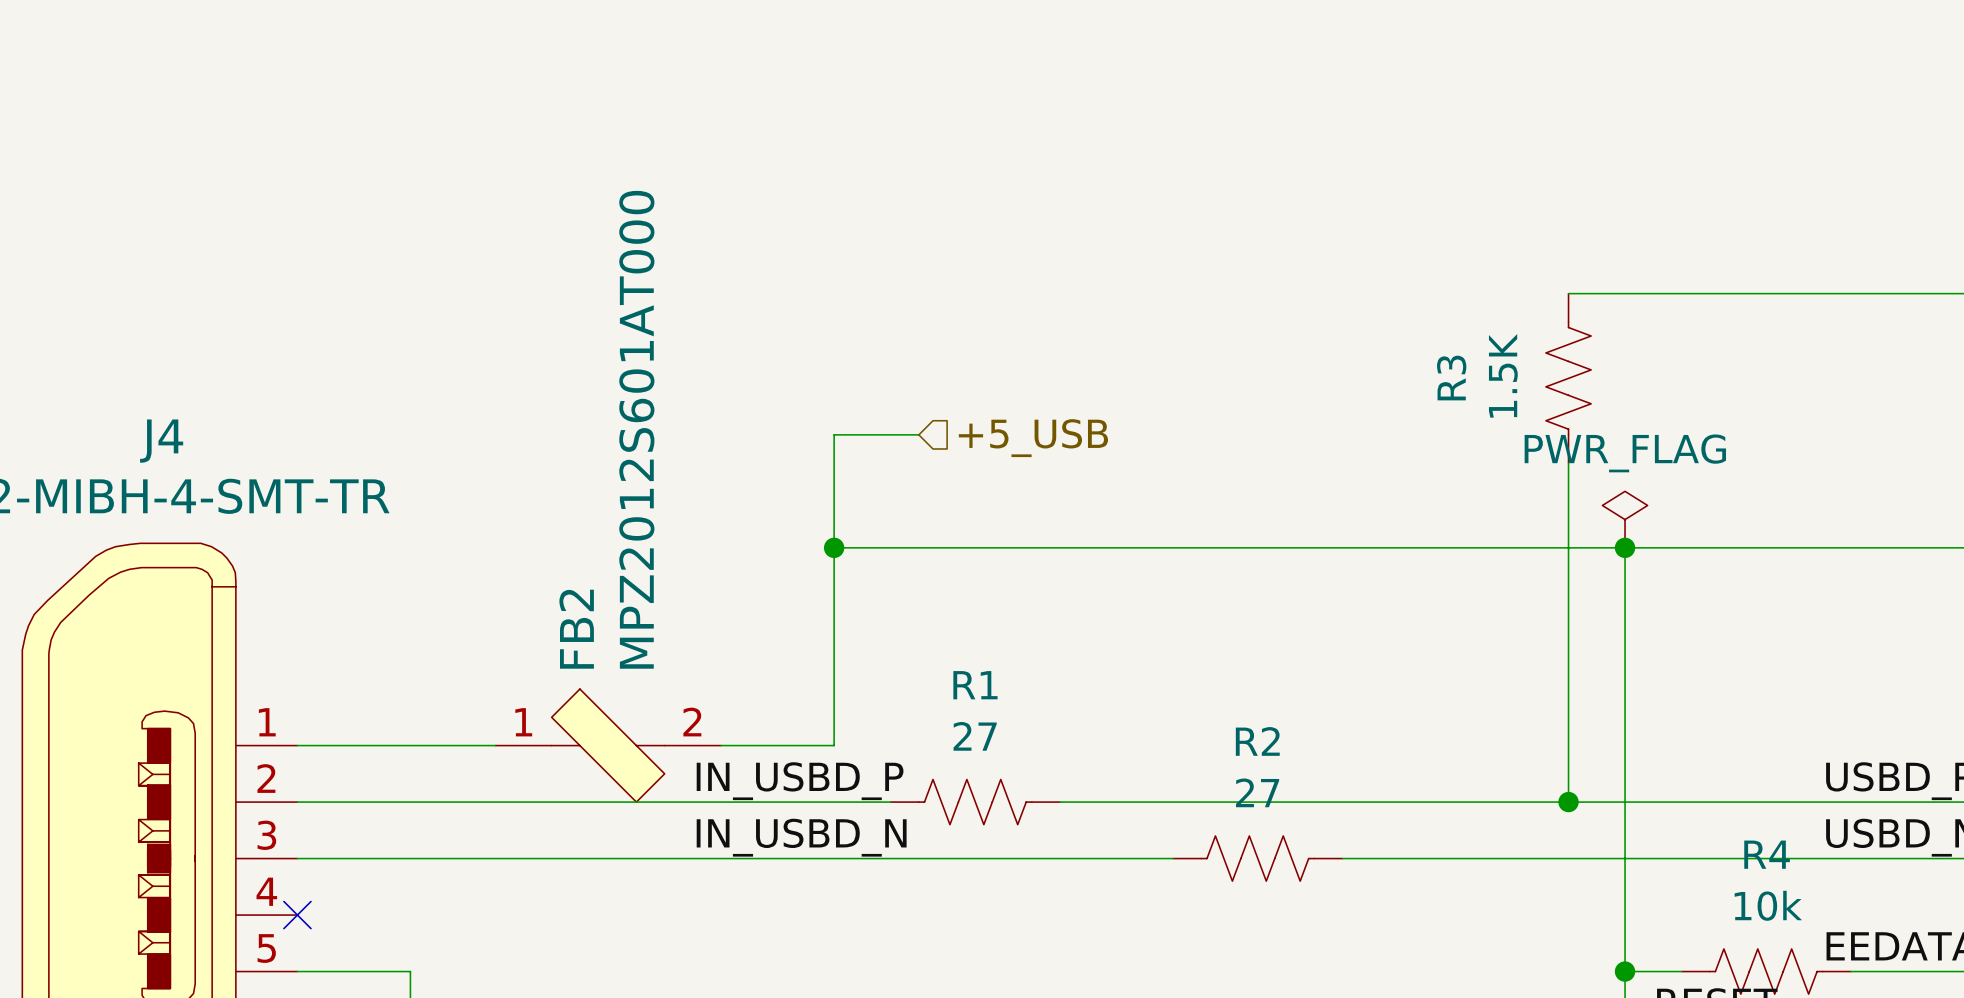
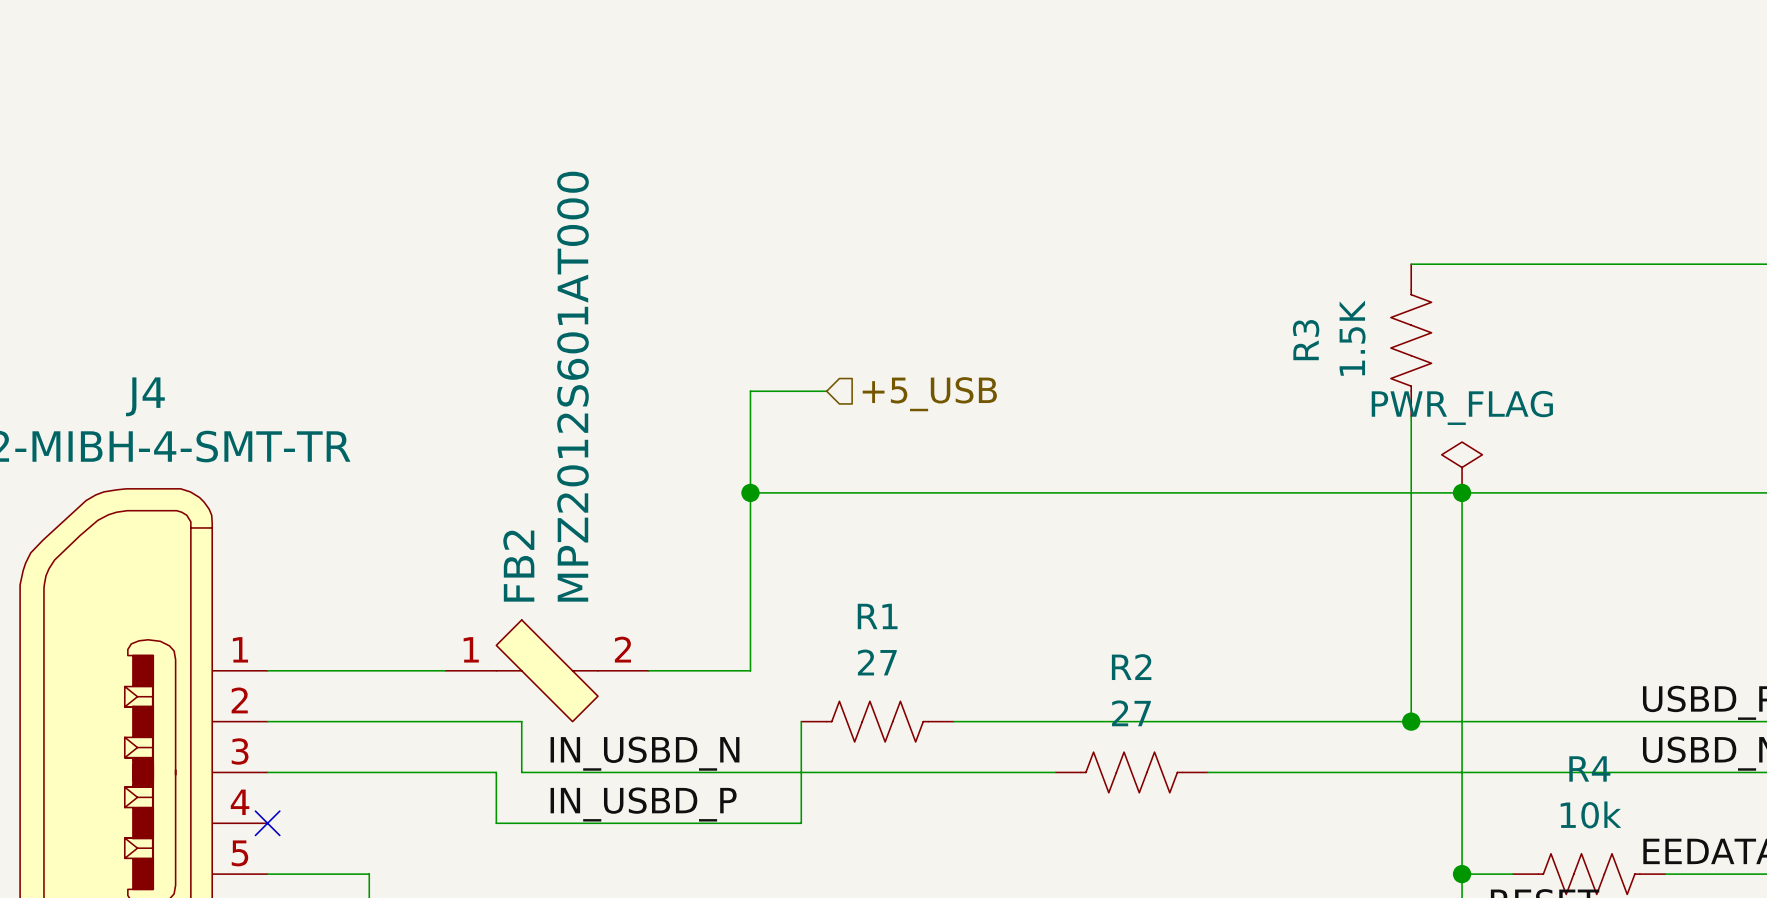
label position: IN_USBD_P (800, 781) -> IN_USBD_P (643, 804)
wire: (579, 802) (890, 802) -> (496, 772) (496, 823) (801, 823) (801, 721)
label position: IN_USBD_N (801, 837) -> IN_USBD_N (645, 753)
wire: (551, 858) (579, 858) -> (521, 721) (521, 772)

